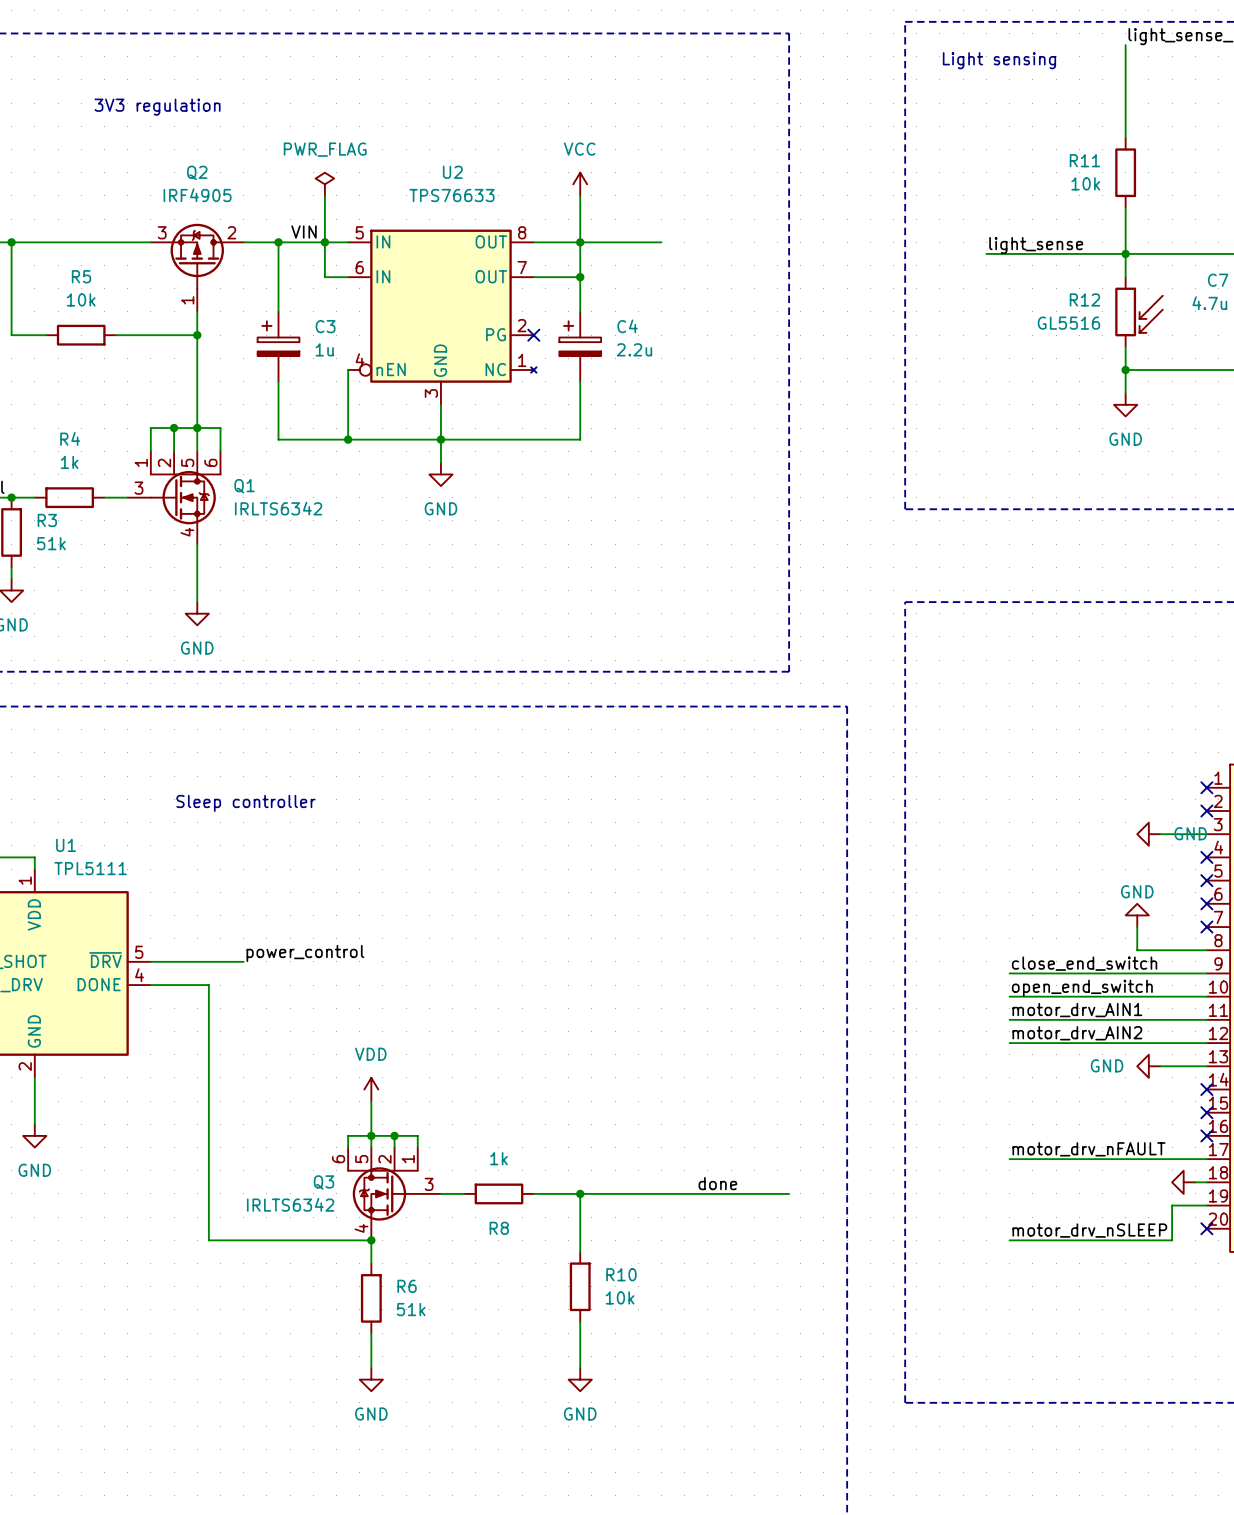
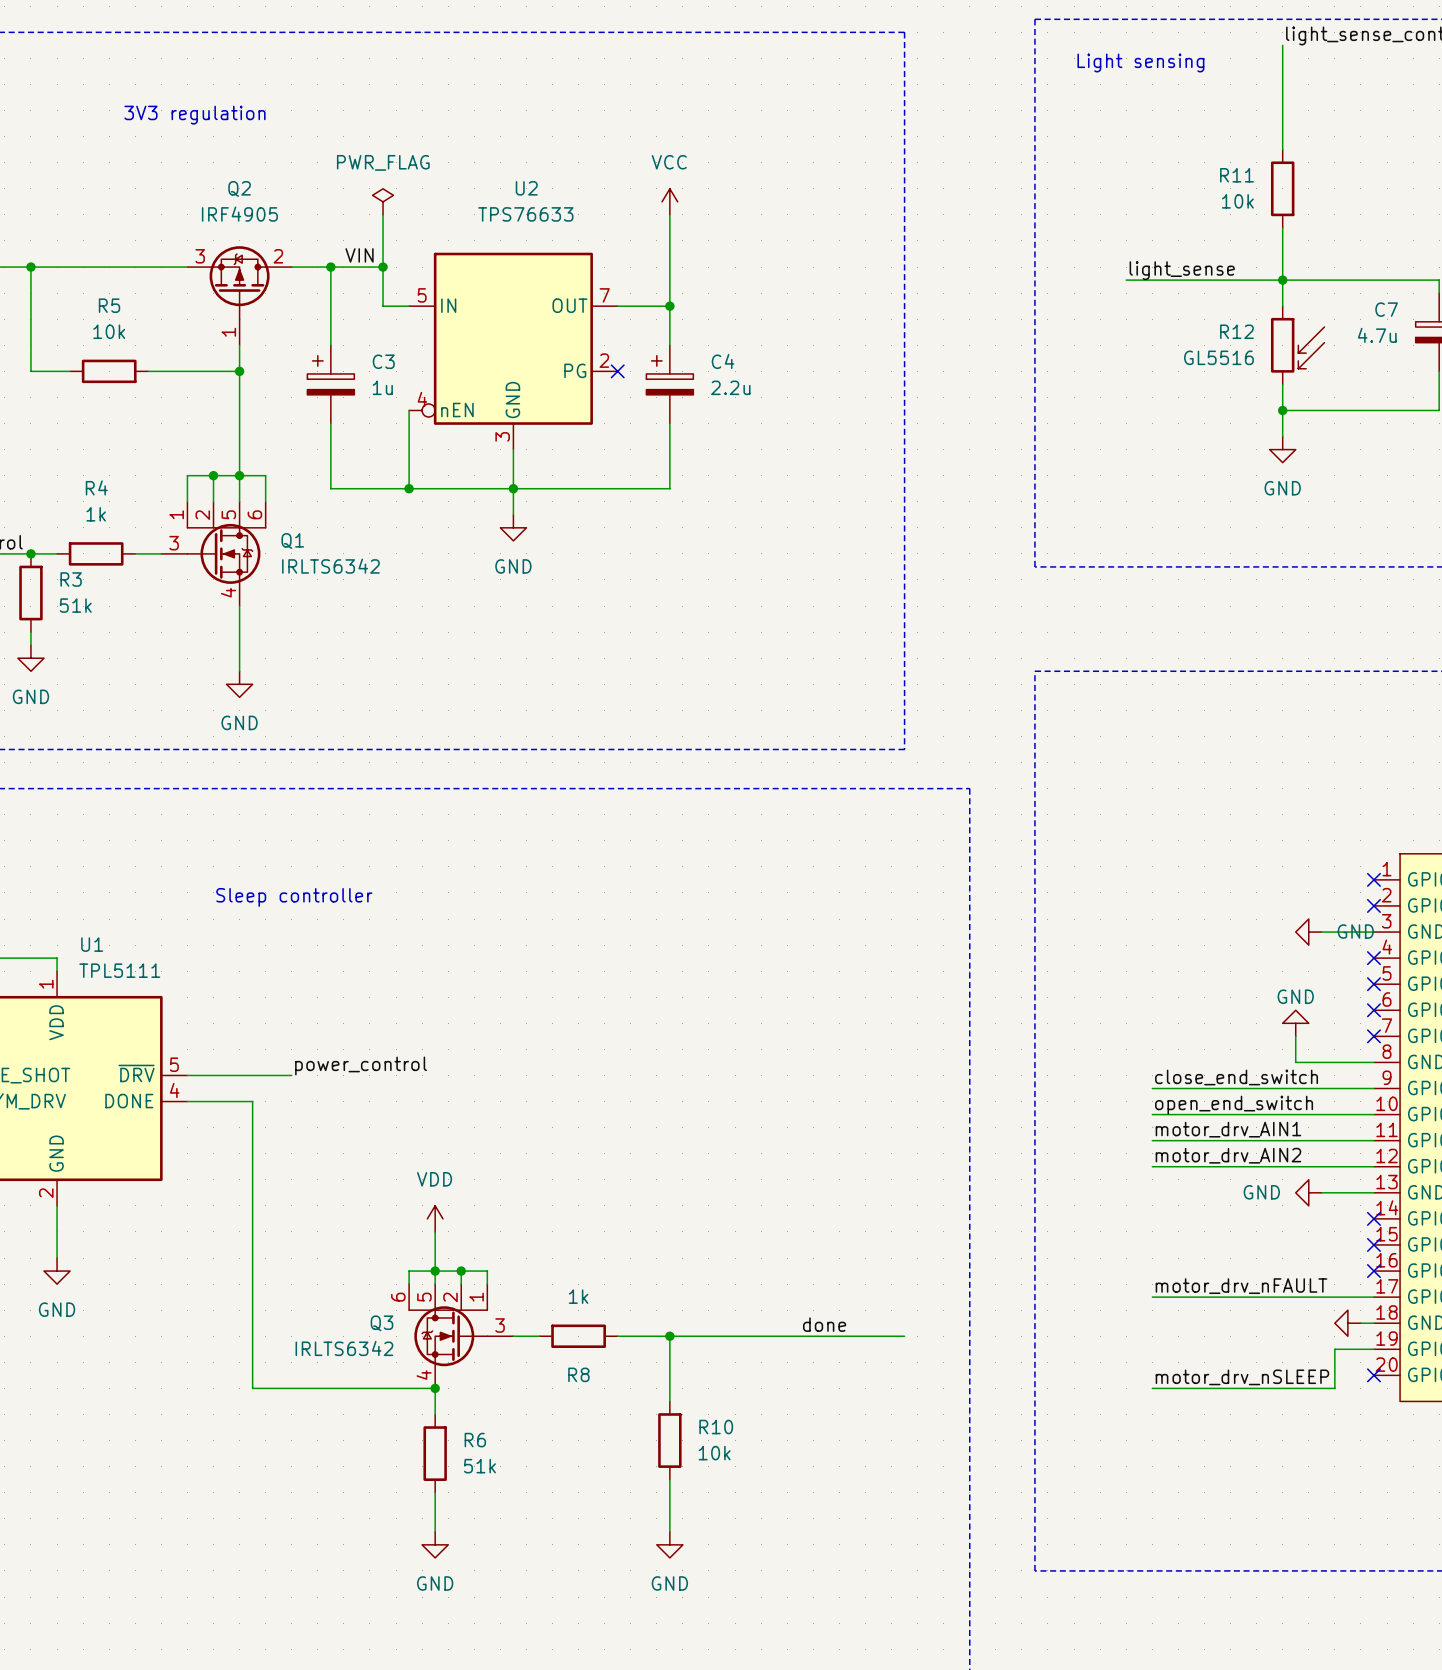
U2 symbol: [348, 229, 537, 405] -> [409, 252, 618, 450]
wire: (324, 242) (348, 242) -> none
wire: (533, 242) (661, 242) -> none
junction: (580, 242) -> none

